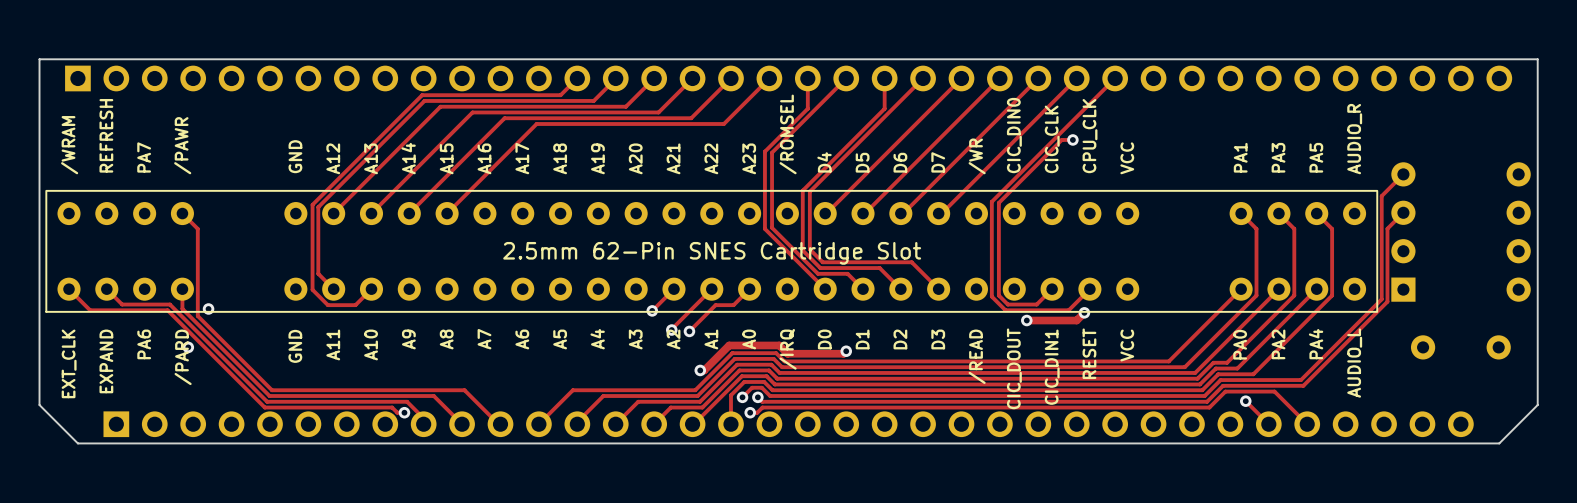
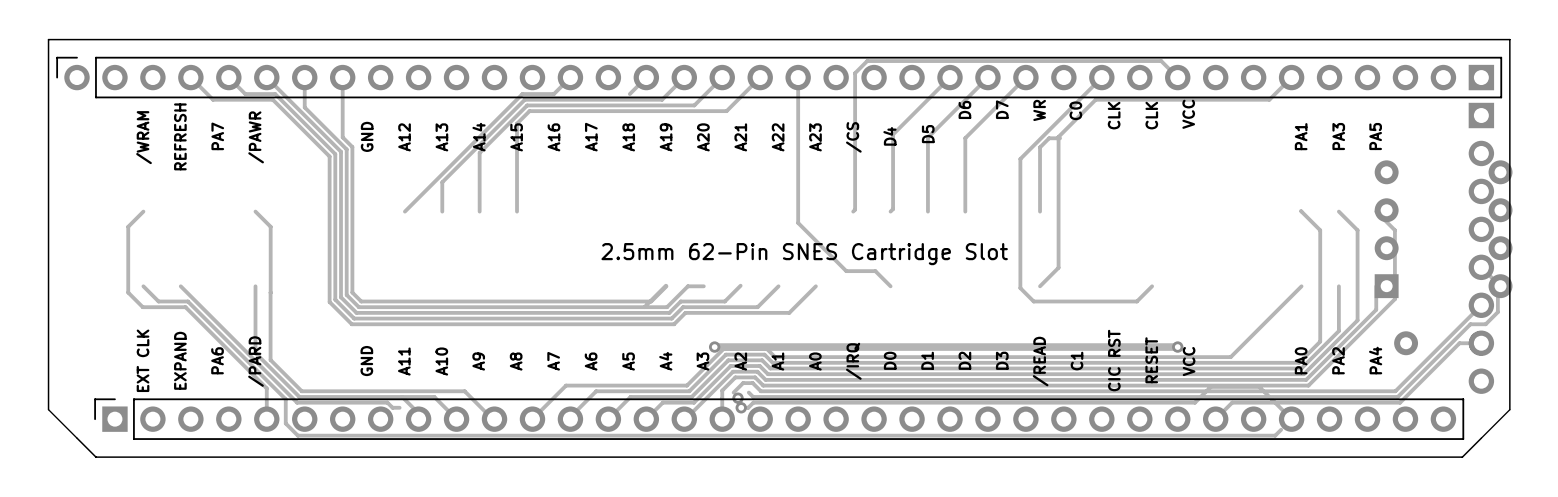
track: none -> (190, 77) (213, 99) (272, 99) (329, 156) (329, 302) (351, 324) (674, 324) (685, 312) (789, 312) (815, 286)
track: none -> (228, 77) (245, 94) (275, 94) (335, 154) (335, 299) (354, 318) (671, 318) (683, 307) (757, 307) (778, 286)
track: none -> (304, 77) (304, 107) (346, 149) (346, 294) (358, 307) (667, 307) (687, 286) (703, 286)
track: none -> (342, 77) (342, 137) (352, 147) (352, 292) (361, 301) (651, 301) (666, 286)
track: (615, 78) (593, 100) -> (662, 99) (586, 99)
part side: bottom (788, 78) -> top (779, 77)
track: (846, 78) (772, 152) (772, 227) (818, 273) (847, 273) (863, 289) -> none
track: (884, 78) (884, 108) (802, 190) (802, 250) (820, 268) (879, 268) (886, 274) -> none
track: (923, 78) (809, 191) (809, 249) (822, 262) (911, 262) (938, 289) -> none
track: (1076, 78) (941, 213) (938, 213) -> none
track: none -> (1177, 77) (1161, 61) (867, 61) (855, 73) (855, 209) (853, 211)
track: none -> (1291, 77) (1269, 99) (1095, 99) (1058, 136) (1058, 267) (1040, 286)
track: (528, 95) (422, 95) (312, 204) (312, 289) (327, 305) (355, 305) (371, 289) -> (522, 94) (404, 211)
track: (637, 95) (625, 106) -> (694, 105) (618, 105)
track: (531, 100) (424, 100) (318, 207) (318, 273) (333, 289) -> (524, 99) (442, 182) (442, 211)
track: (670, 100) (658, 112) -> (726, 111) (650, 111)
track: (533, 106) (440, 106) (333, 213) -> (527, 105) (479, 152) (479, 211)
track: (702, 106) (691, 118) (504, 118) (409, 213) -> none
track: (807, 108) (764, 151) (764, 228) (825, 289) -> (798, 107) (798, 222) (846, 271) (875, 271)
text: none -> D6 (964, 109)
text: none -> D7 (1002, 109)
text: none -> WR (1039, 110)
track: (535, 112) (472, 112) (371, 213) -> (529, 111) (517, 123) (517, 211)
track: (735, 112) (723, 124) (536, 124) (447, 213) -> none
text: none -> C0 (1075, 110)
text: none -> VCC (1188, 114)
text: none -> CLK (1114, 115)
text: none -> CLK (1151, 115)
text: none -> D5 (928, 134)
track: (903, 136) (825, 213) -> (893, 134) (893, 209) (890, 211)
text: none -> REFRESH (180, 136)
text: none -> PA7 (217, 136)
text: none -> GND (367, 136)
text: none -> A14 (479, 137)
text: none -> A17 (591, 137)
text: none -> D4 (889, 136)
text: none -> PA1 (1301, 136)
text: none -> PA3 (1338, 136)
text: none -> PA5 (1375, 136)
text: none -> /WRAM (144, 137)
text: none -> /PAWR (256, 137)
text: none -> A12 (404, 137)
text: none -> A13 (441, 137)
text: none -> A15 (516, 137)
text: none -> A16 (553, 137)
text: none -> A18 (628, 137)
text: none -> A19 (666, 137)
text: none -> A20 (703, 137)
text: none -> A21 (740, 137)
text: none -> A22 (778, 137)
text: none -> A23 (815, 137)
text: none -> /CS (853, 137)
track: (939, 139) (863, 213) -> (927, 137) (927, 211)
track: (976, 139) (903, 213) (900, 213) -> (965, 138) (965, 211)
via: (1072, 139) -> none
track: (1052, 149) (998, 202) (998, 295) (1007, 304) (1036, 304) (1052, 289) -> (1040, 147) (1040, 211)
track: (1032, 160) (991, 201) (991, 296) (1005, 310) (1068, 310) (1089, 289) -> (1020, 158) (1020, 288) (1033, 301) (1136, 301) (1152, 286)
track: (1403, 174) (1381, 196) (1381, 299) (1301, 380) (1220, 380) (1204, 396) -> (1481, 305) (1395, 391) (1190, 391)
track: (1403, 212) (1387, 228) (1387, 301) (1303, 385) (1223, 385) (1207, 401) -> (1481, 267) (1497, 283) (1497, 312) (1485, 324) (1470, 324) (1397, 396) (1192, 396)
track: (182, 213) (197, 228) (197, 316) (271, 390) (464, 390) (470, 396) -> (428, 391) (464, 391)
track: (1241, 213) (1256, 228) (1256, 295) (1184, 367) -> none
track: (1278, 213) (1294, 228) (1294, 295) (1227, 362) (1213, 362) (1197, 378) -> (1338, 211) (1357, 230) (1357, 320) (1303, 374) (1183, 374)
track: none -> (143, 211) (128, 226) (128, 292) (142, 307) (185, 307) (266, 388) (266, 419)
track: none -> (255, 211) (270, 226) (270, 292)
track: none -> (1376, 211) (1394, 230) (1394, 299) (1308, 385) (1187, 385)
track: (1332, 228) (1332, 295) (1253, 374) (1218, 374) (1202, 390) -> (1316, 226) (1320, 230) (1320, 341) (1299, 362) (1170, 362)
part: (711, 251) -> none
part: none -> (1481, 248)
text: none -> 2.5mm 62-Pin SNES Cartridge Slot (804, 254)
track: (69, 289) (90, 310) (167, 310) (264, 407) (300, 407) -> (180, 286) (297, 402)
track: (106, 289) (122, 304) (169, 304) (267, 401) (303, 401) -> (255, 286) (255, 352) (299, 396)
track: none -> (143, 286) (158, 301) (187, 301) (285, 399) (285, 423) (297, 435) (1275, 435) (1281, 429)
track: (182, 289) (182, 308) (269, 396) (305, 396) -> (270, 292) (270, 360) (301, 391)
track: (711, 289) (671, 330) -> none
track: (1241, 289) (1168, 361) -> (1301, 286) (1230, 357) (1154, 357)
track: (1278, 289) (1195, 372) -> (1338, 286) (1338, 331) (1301, 368) (1180, 368)
track: (1316, 289) (1237, 368) (1215, 368) (1199, 384) -> (1376, 286) (1376, 309) (1306, 379) (1185, 379)
track: (715, 305) (689, 331) -> (707, 301) (680, 301) (669, 312) (356, 312) (341, 297) (341, 151) (266, 77)
via: (208, 308) -> none
via: (652, 310) -> none
track: (1084, 312) (1076, 320) (1026, 320) -> none
via: (1084, 312) -> none
via: (1026, 320) -> none
via: (671, 330) -> none
via: (689, 331) -> none
via: (188, 347) -> none
track: none -> (1481, 343) (1459, 343) (1400, 402) (1232, 402) (1215, 419)
track: none -> (714, 347) (1177, 347)
via: none -> (714, 347)
track: (846, 351) (843, 353) (787, 353) (779, 345) (729, 345) (704, 370) (700, 370) -> none
via: (846, 351) -> none
via: none -> (1177, 347)
text: none -> CIC RST (1114, 360)
text: none -> RESET (1151, 360)
text: none -> PA4 (1375, 360)
text: none -> EXT CLK (143, 360)
text: none -> EXPAND (180, 360)
text: none -> PA6 (217, 360)
text: none -> /PARD (255, 361)
text: none -> GND (366, 361)
text: none -> A11 (404, 361)
text: none -> A10 (441, 361)
text: none -> A9 (478, 361)
text: none -> A8 (516, 361)
text: none -> A7 (553, 361)
text: none -> A6 (591, 361)
text: none -> A5 (628, 361)
text: none -> A4 (665, 361)
text: none -> A3 (702, 361)
text: none -> A2 (740, 361)
text: none -> A1 (777, 361)
text: none -> A0 (815, 361)
text: none -> /IRQ (853, 361)
text: none -> D0 (890, 360)
text: none -> D1 (927, 360)
text: none -> D2 (964, 360)
text: none -> D3 (1002, 360)
text: none -> /READ (1040, 361)
text: none -> C1 (1076, 361)
text: none -> VCC (1189, 361)
text: none -> PA0 (1301, 360)
text: none -> PA2 (1338, 360)
via: (700, 370) -> none
track: (433, 396) (439, 401) -> (402, 396) (434, 396)
via: (742, 397) -> none
via: (757, 397) -> none
track: (1245, 401) (1268, 424) -> none
via: (1245, 401) -> none
via: none -> (738, 398)
via: (404, 412) -> none
board edge: (49, 414) (39, 405) (39, 59) (1537, 59) (1537, 405) (1528, 414) -> (48, 409) (48, 39) (1509, 39) (1509, 409)
part side: bottom (788, 424) -> top (779, 419)
board edge: (77, 443) (1499, 443) -> (77, 438) (95, 457) (1462, 457) (1481, 438)

